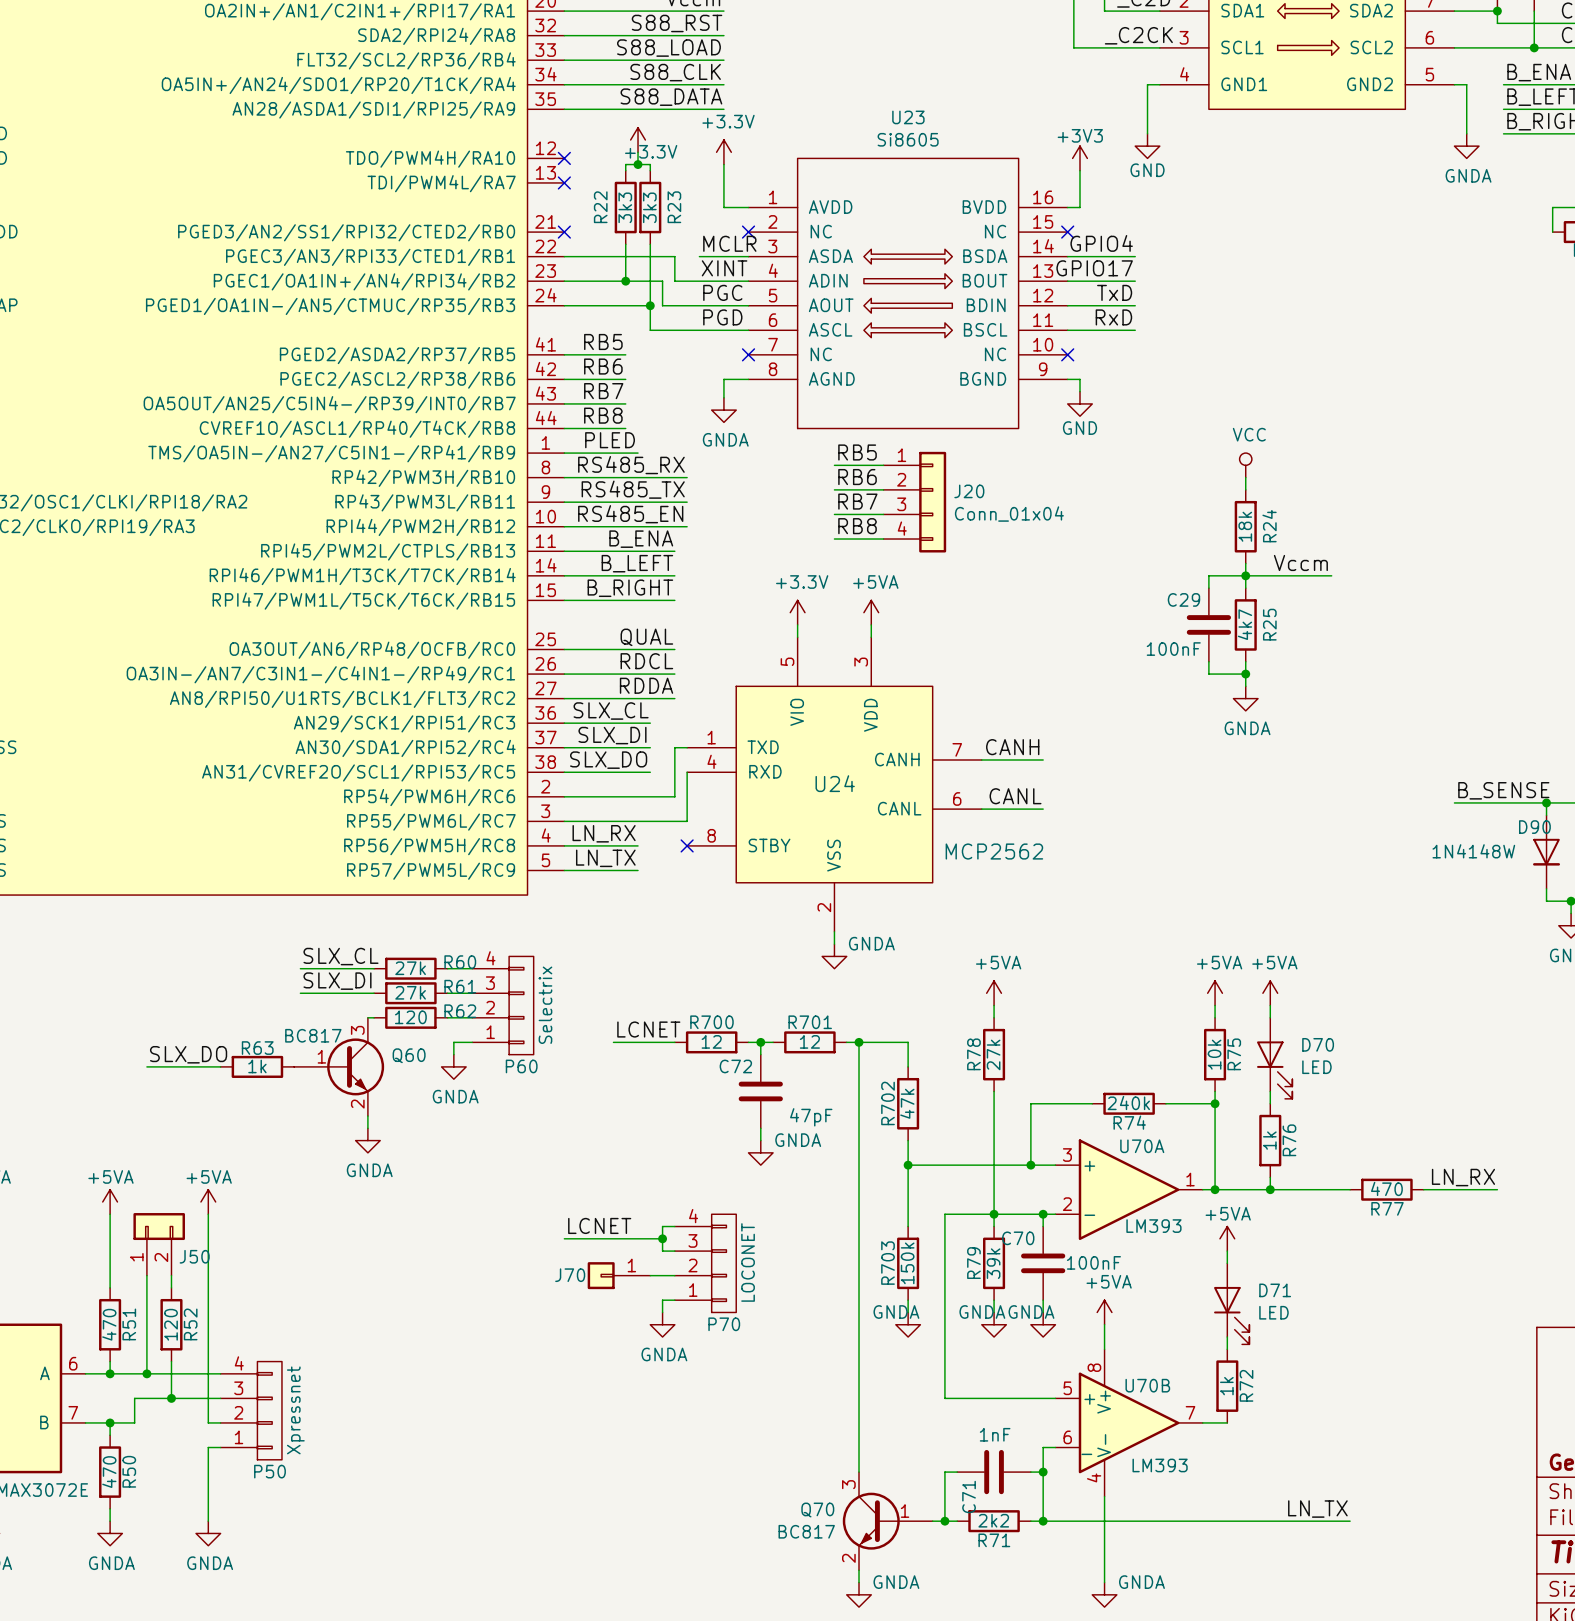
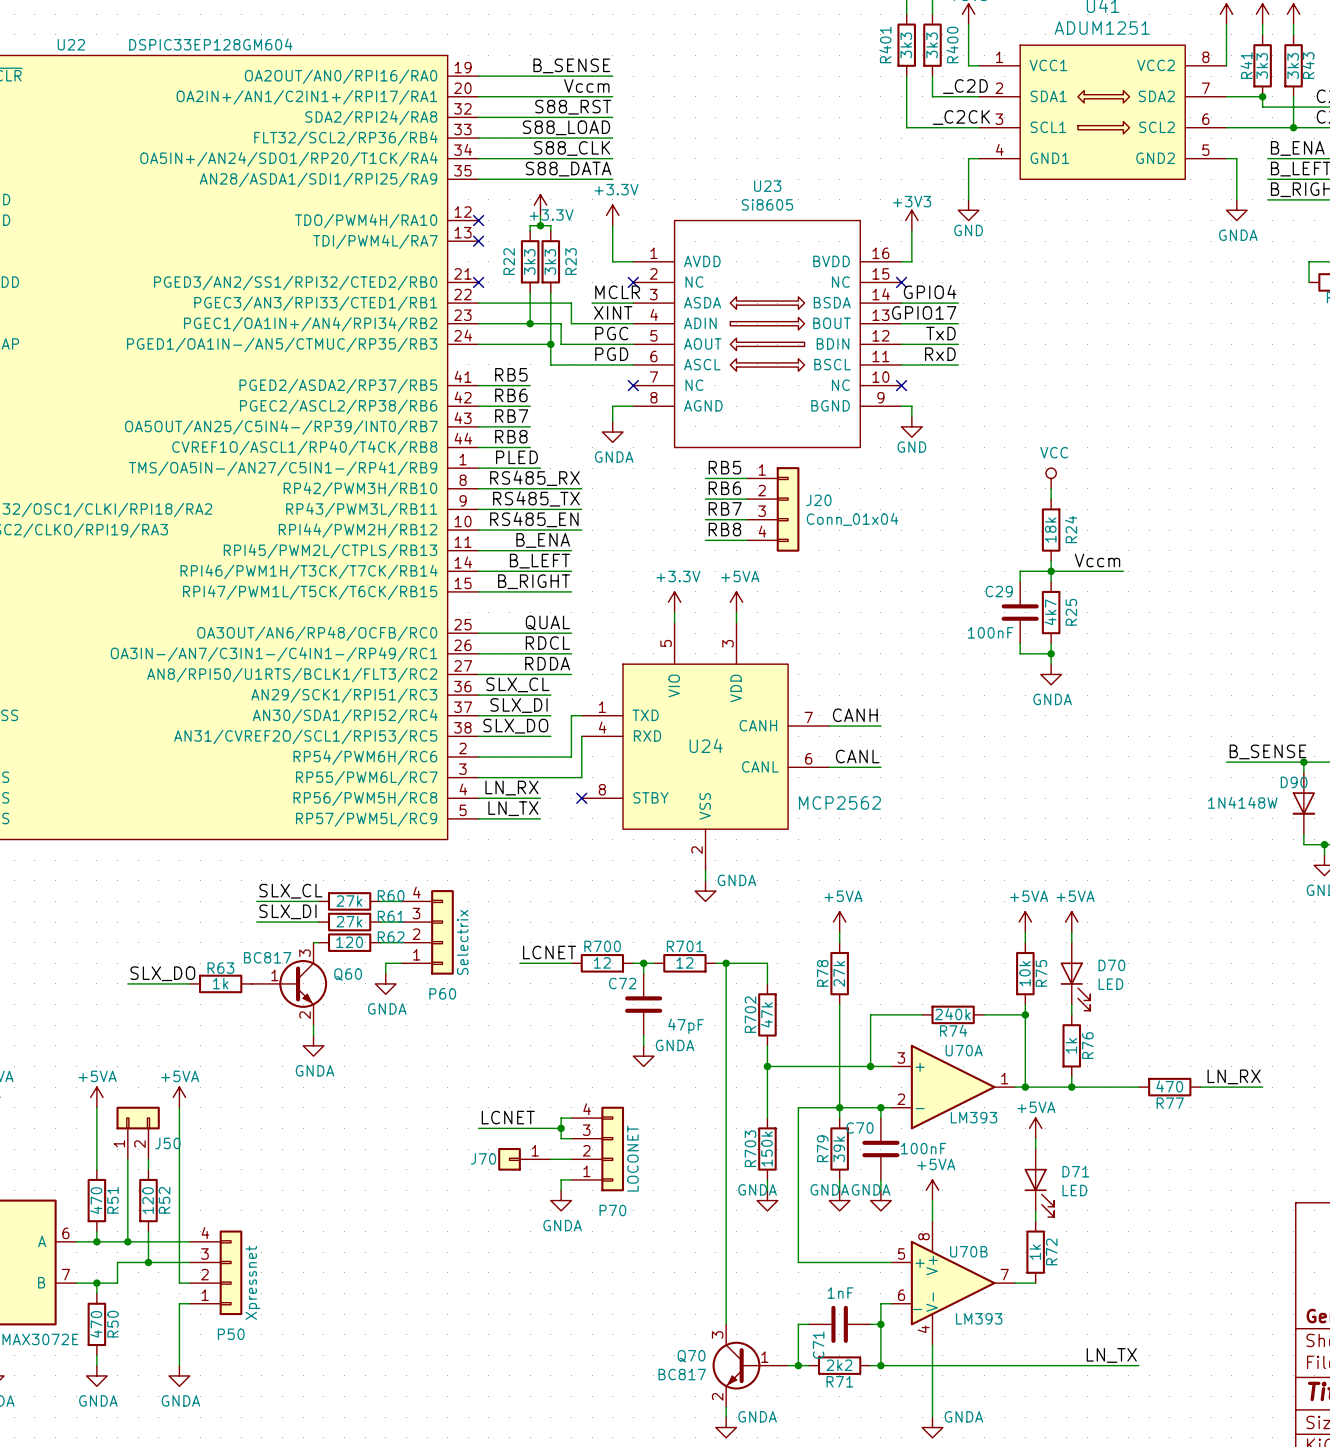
P60 symbol: [472, 956, 534, 1055] -> [401, 890, 454, 975]
P70 symbol: [674, 1214, 737, 1313] -> [571, 1106, 625, 1192]
P50 symbol: [220, 1361, 282, 1460] -> [189, 1230, 243, 1316]

